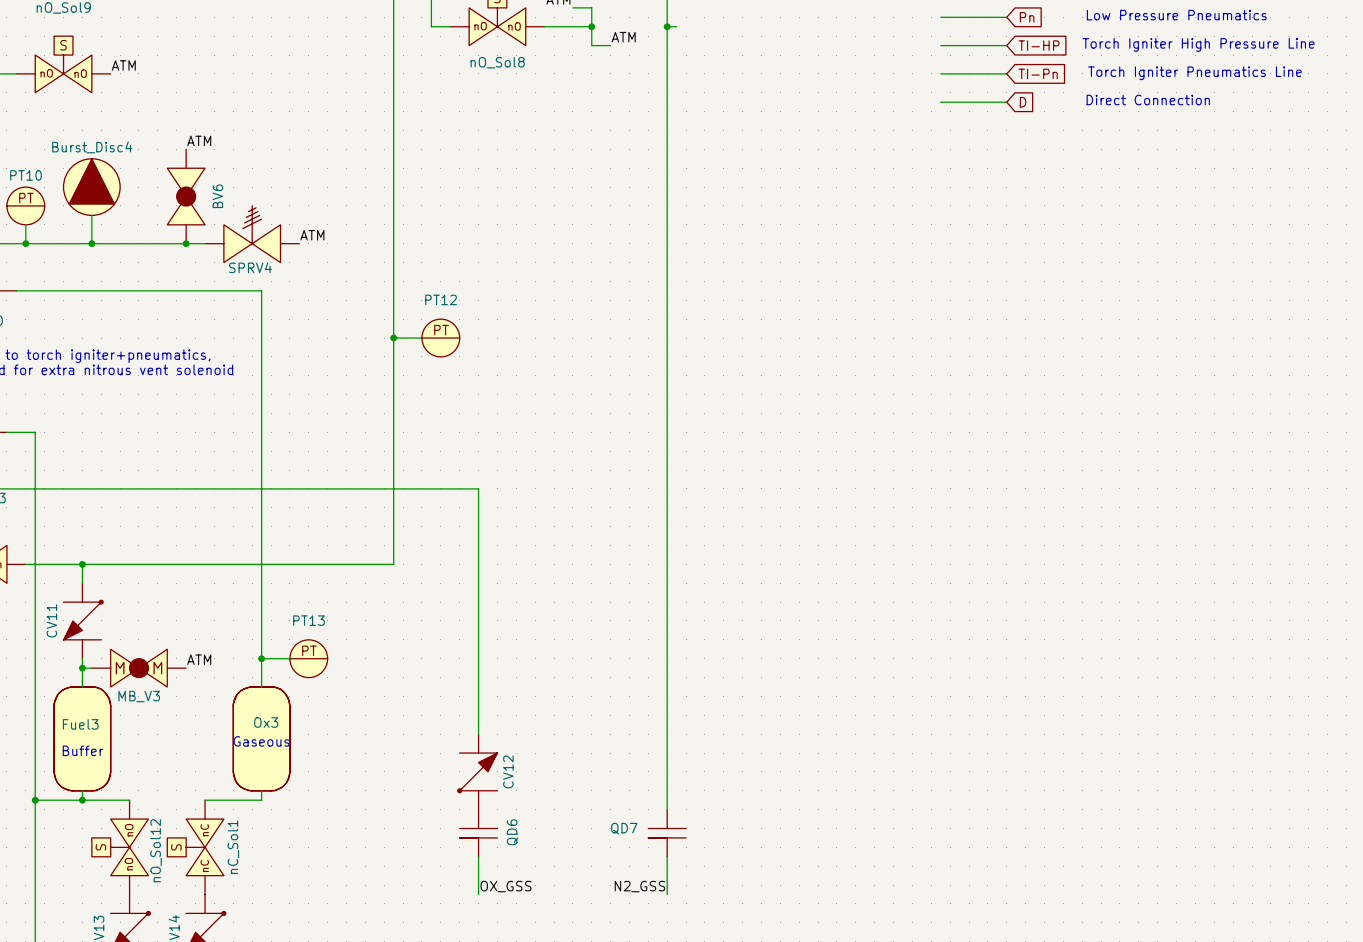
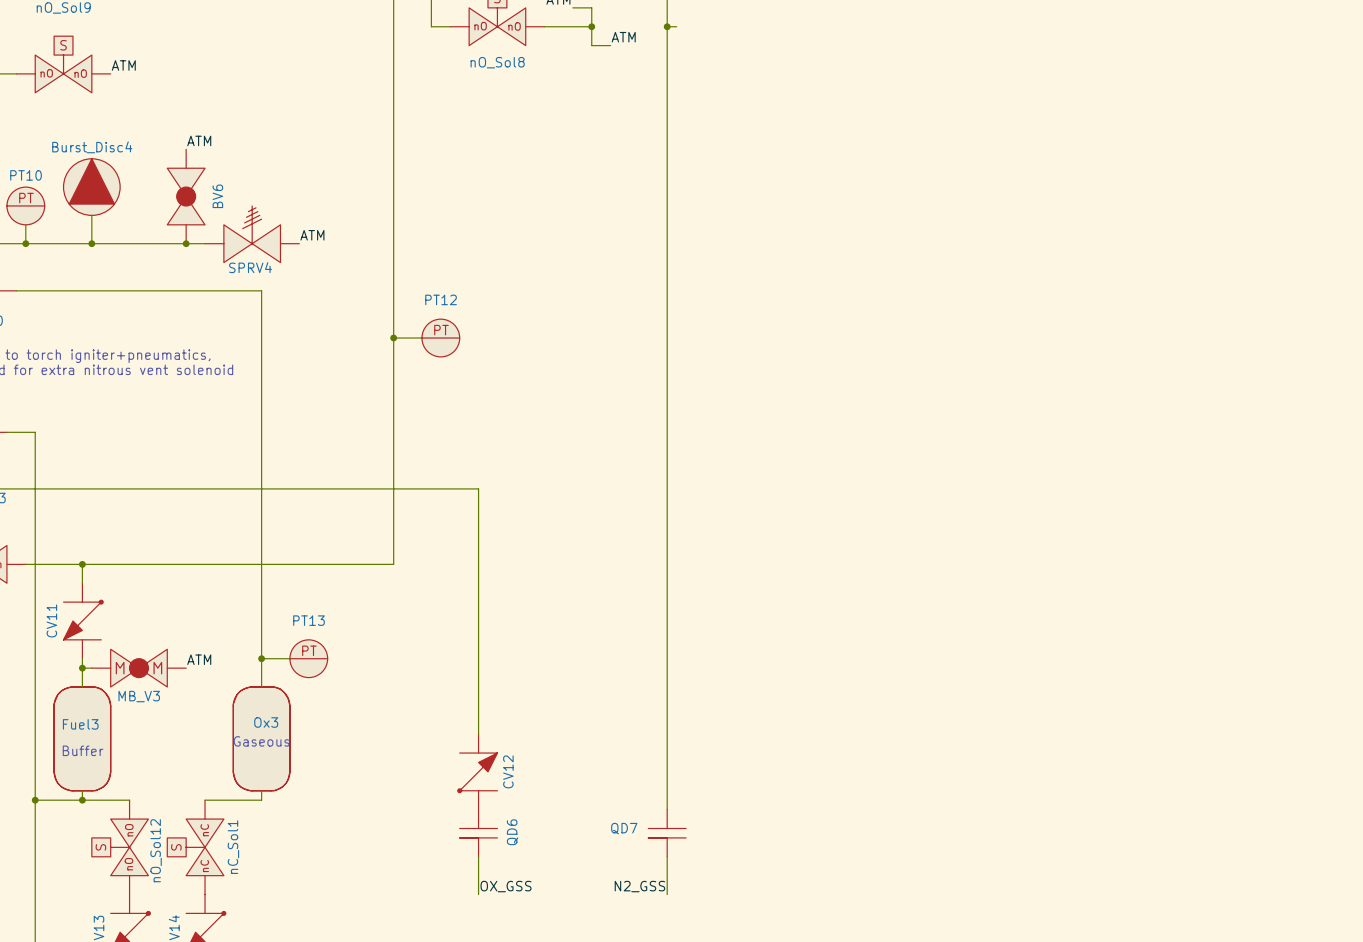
text: Low Pressure Pneumatics (1176, 15) -> none
wire: (940, 17) (1006, 17) -> none
global label: Pn (1027, 17) -> none
text: Torch Igniter High Pressure Line (1198, 44) -> none
wire: (940, 45) (1006, 45) -> none
global label: TI-HP (1039, 45) -> none
wire: (940, 73) (1006, 73) -> none
global label: TI-Pn (1038, 73) -> none
text: Torch Igniter Pneumatics Line (1194, 73) -> none
text: Direct Connection (1148, 100) -> none
wire: (940, 102) (1006, 102) -> none
global label: D (1023, 102) -> none

